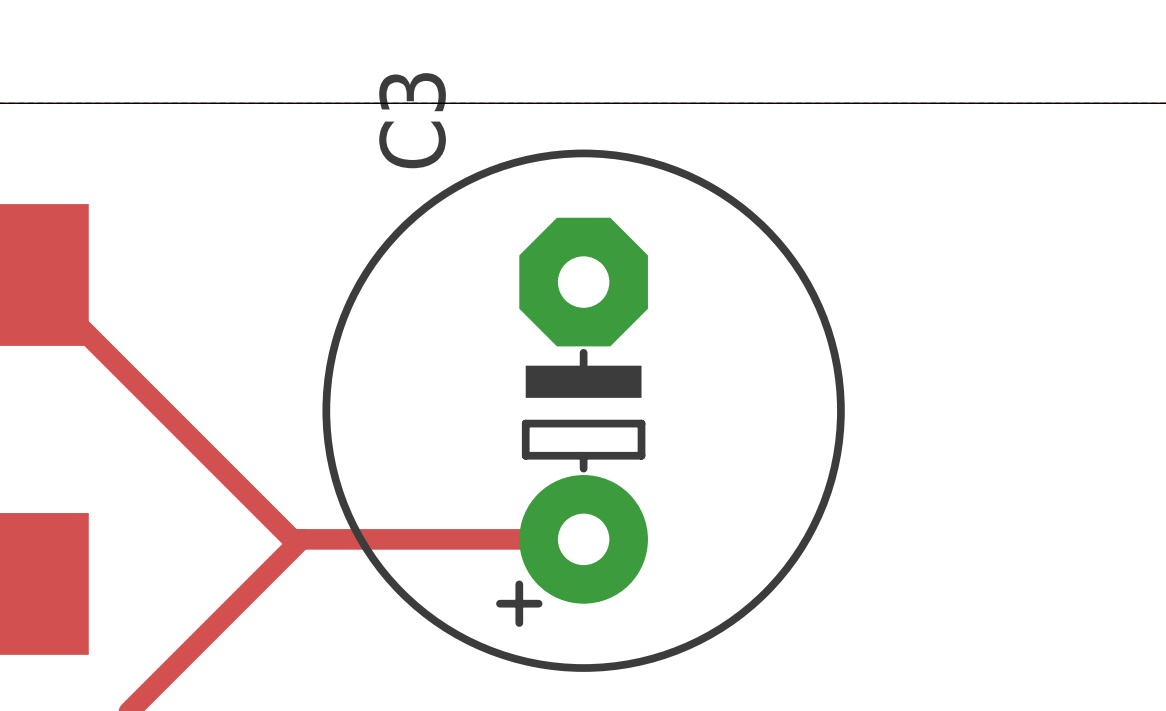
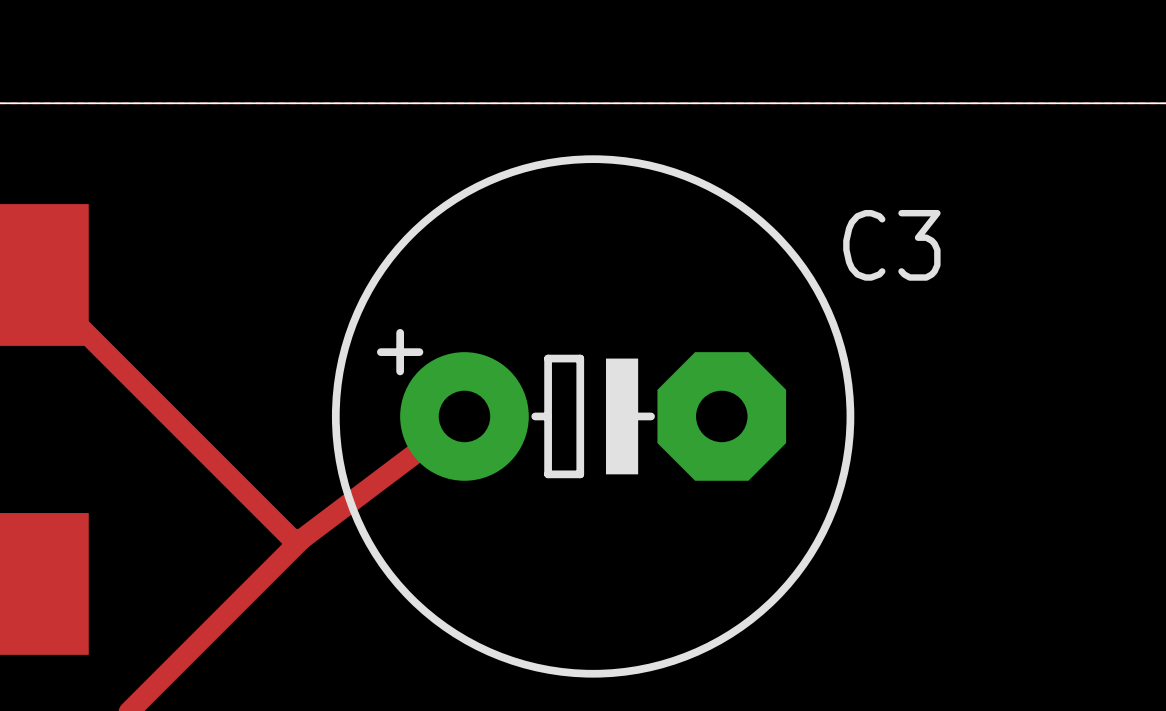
C3 rotation: 0° (583, 410) -> 90° clockwise (593, 416)
track: (301, 539) (583, 539) -> (301, 539) (464, 416)

